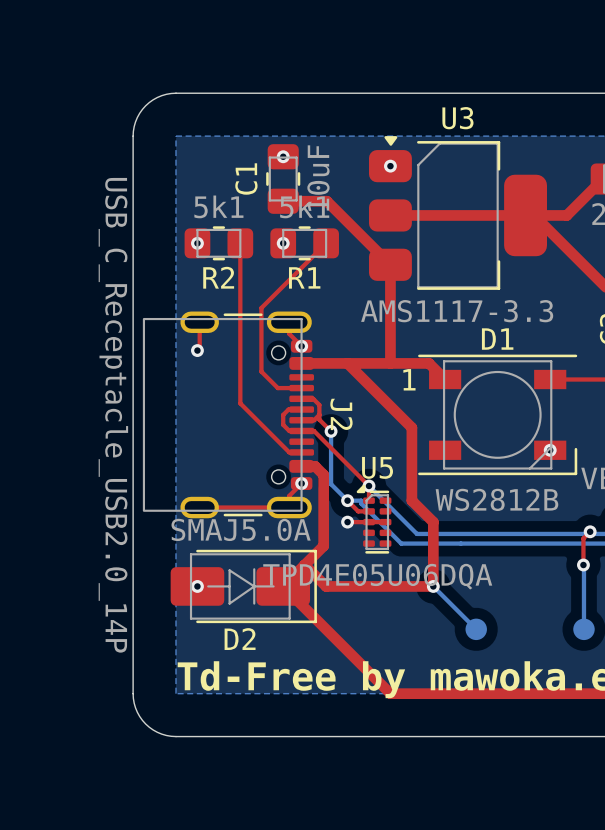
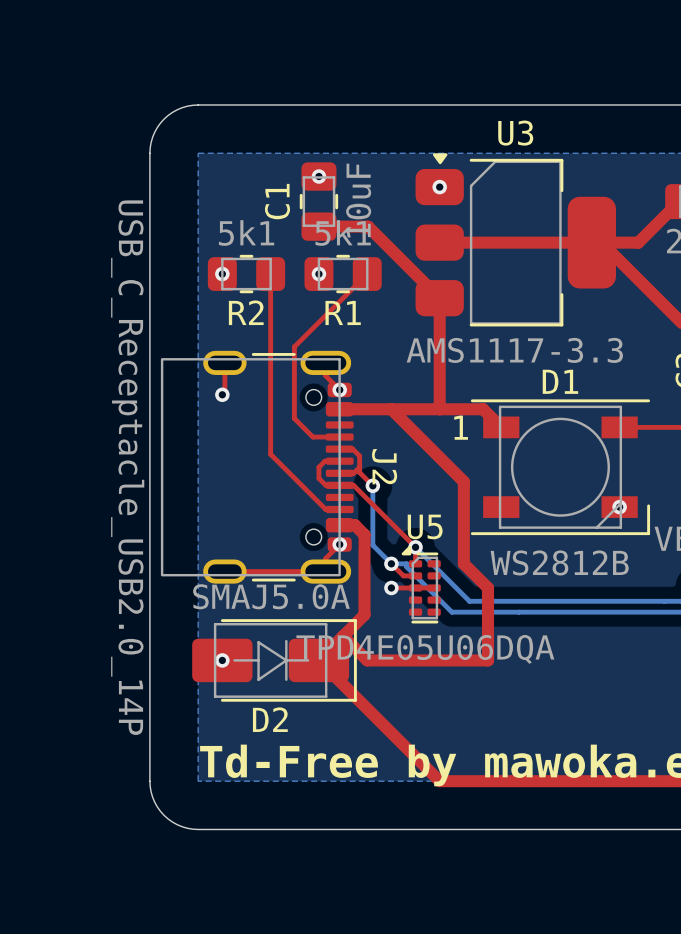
top track: (590, 531) (583, 538) (583, 565) -> none
via: (590, 531) -> none
bottom track: (583, 565) (583, 629) -> none
via: (583, 565) -> none
bottom track: (433, 586) (476, 629) -> none
via: (433, 586) -> none
part: (476, 629) -> none
part: (583, 629) -> none

